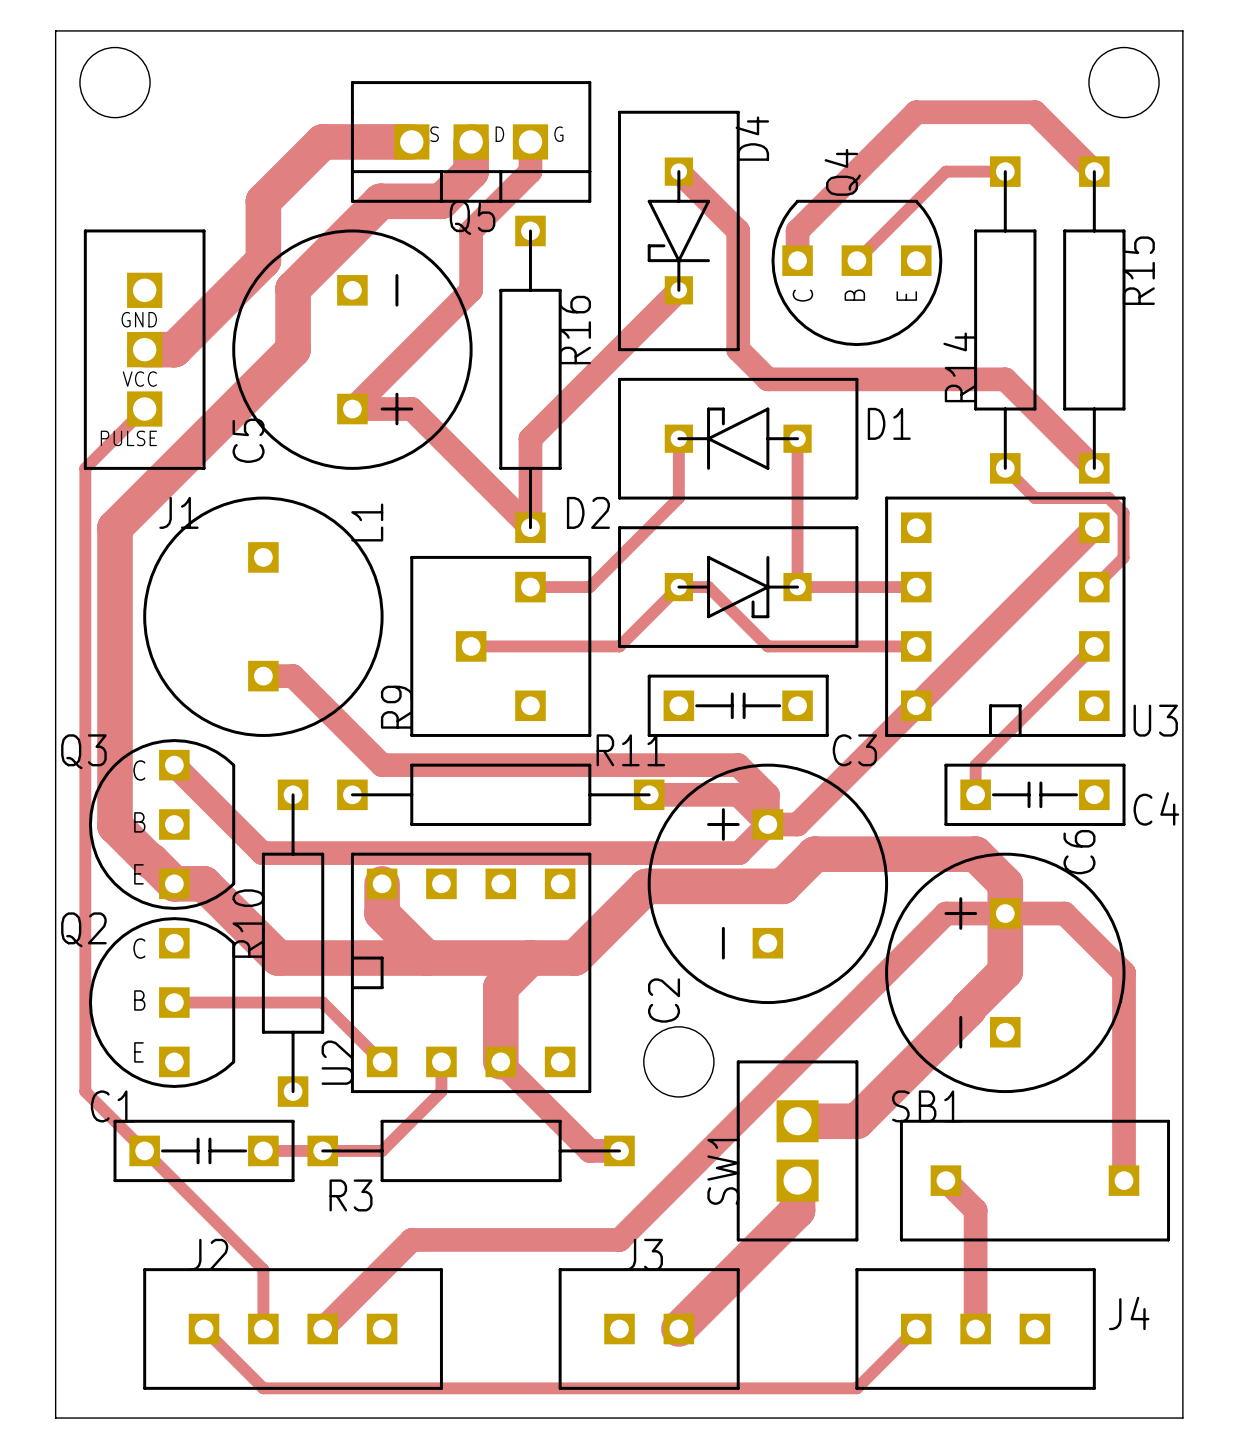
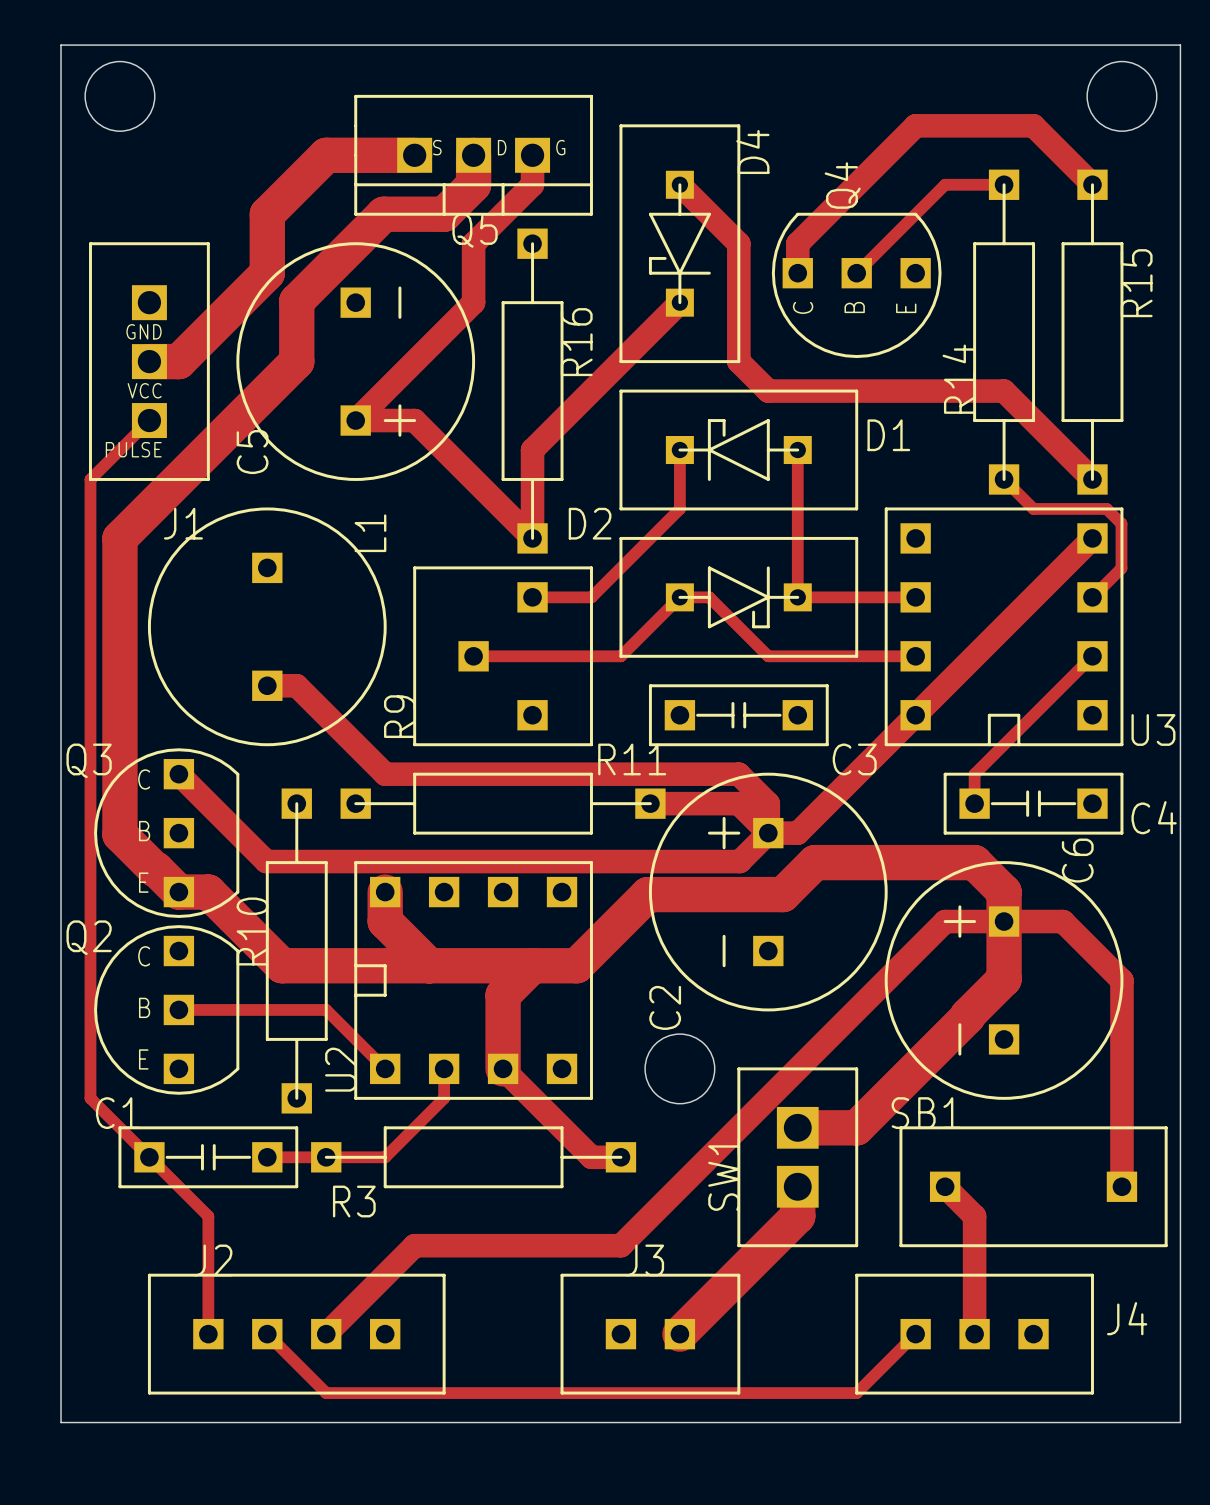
track: (204, 1210) (263, 1269) (263, 1328) -> (208, 1216) (208, 1334)
track: (204, 1328) (263, 1388) (322, 1388) -> (267, 1334) (326, 1393)

